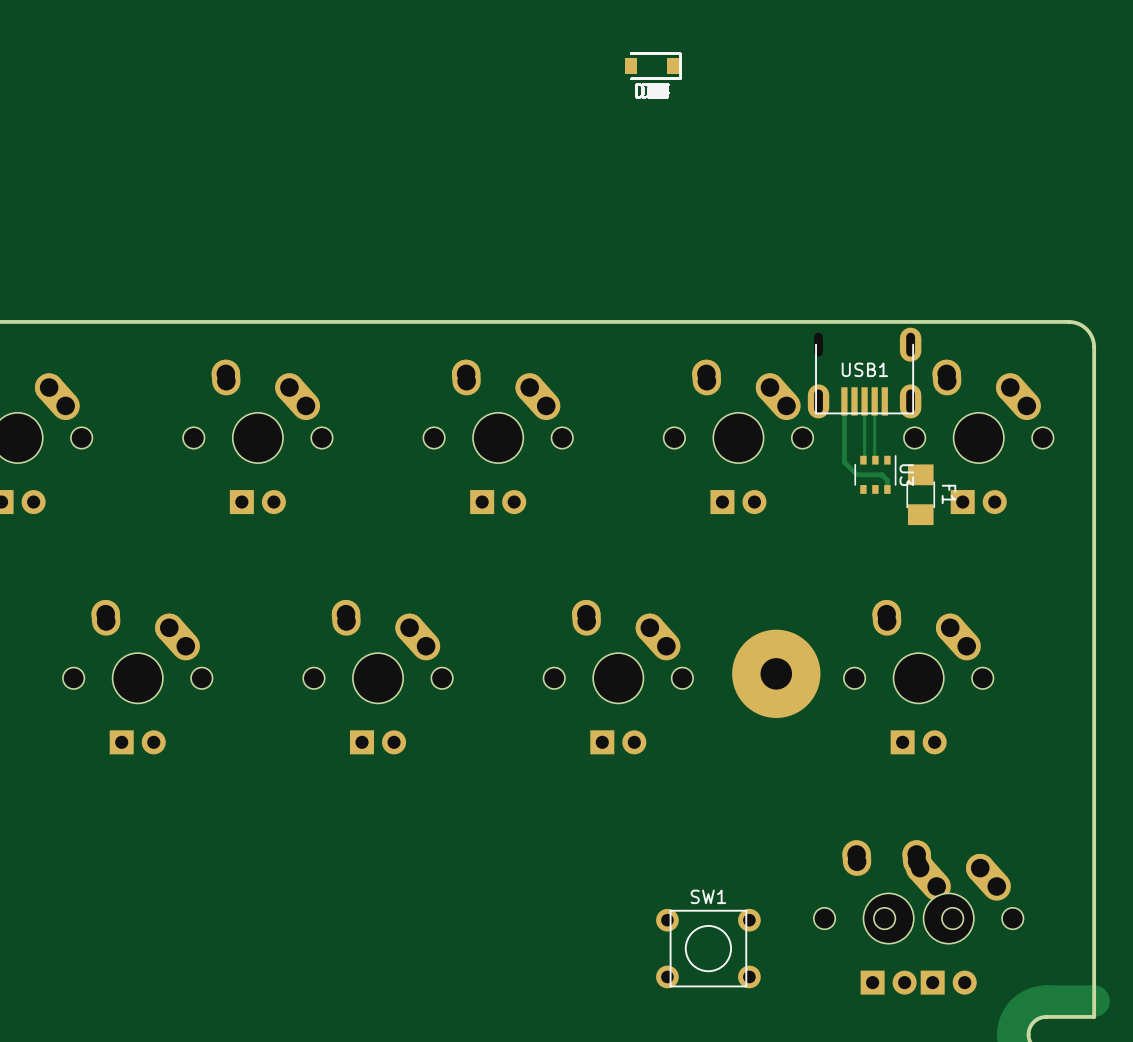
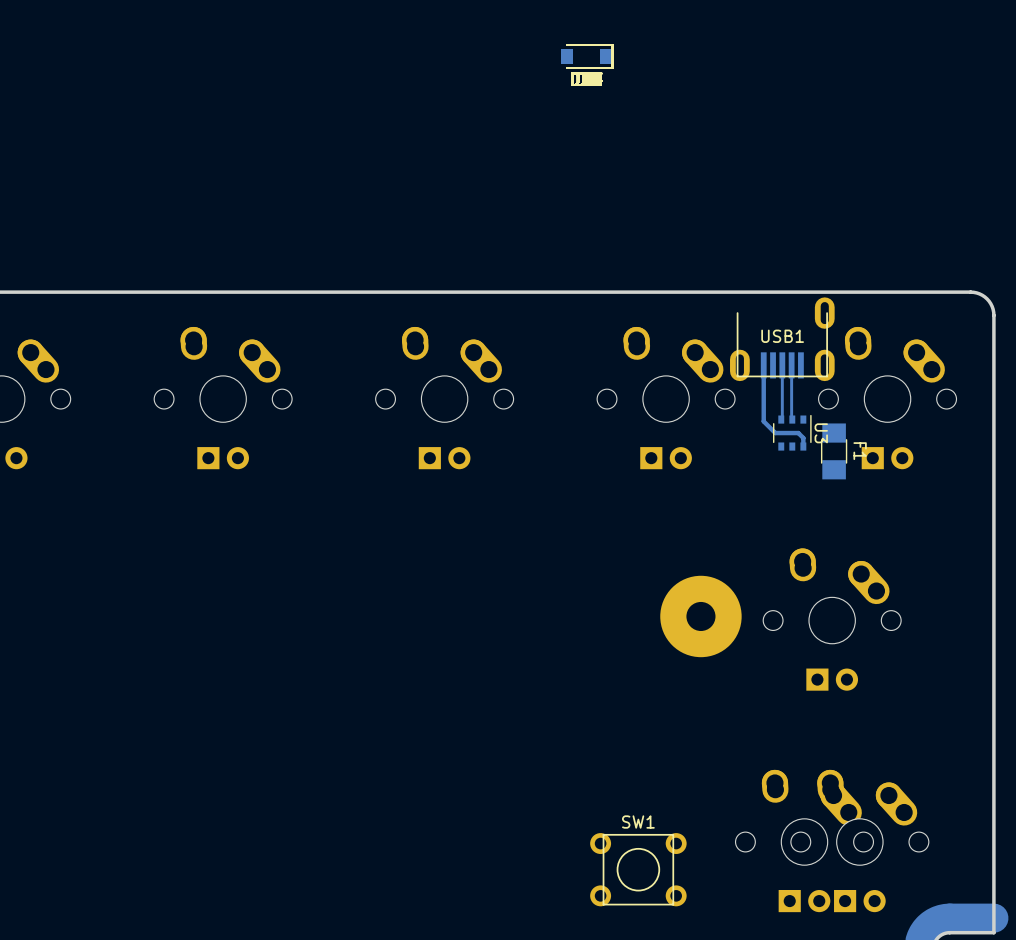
part: (137, 677) -> none
part: (378, 677) -> none
part: (618, 677) -> none

